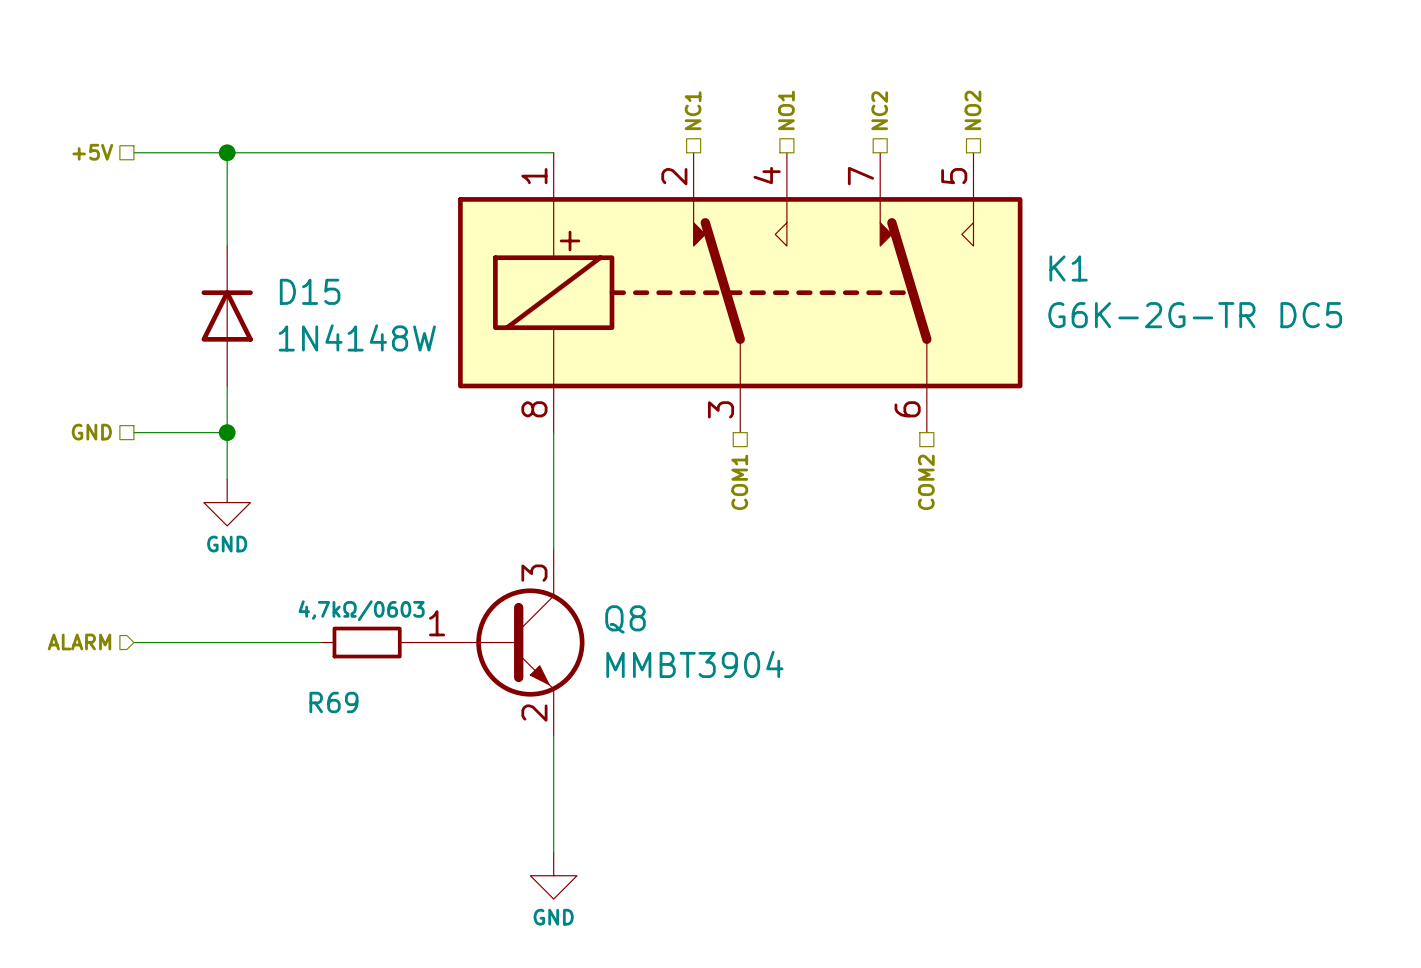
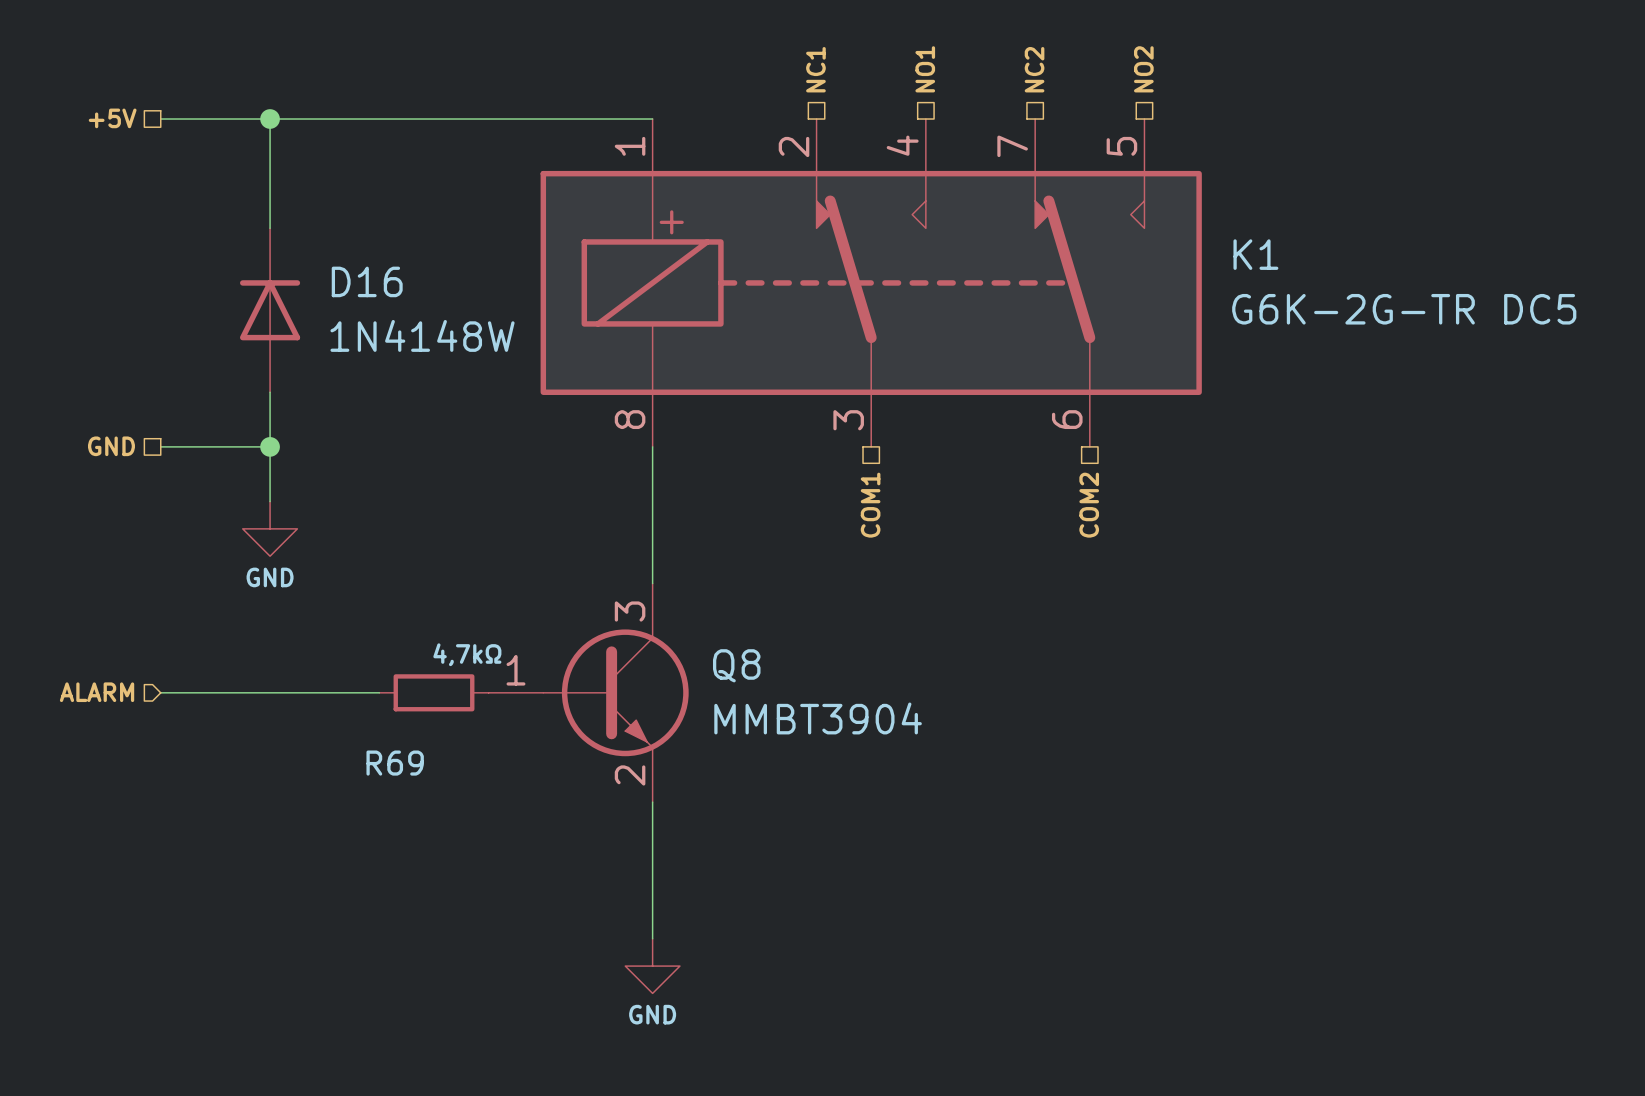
D15 name: D15 (310, 291) -> D16 (367, 281)
R69 value: 4,7kΩ/0603 (361, 610) -> 4,7kΩ (467, 654)

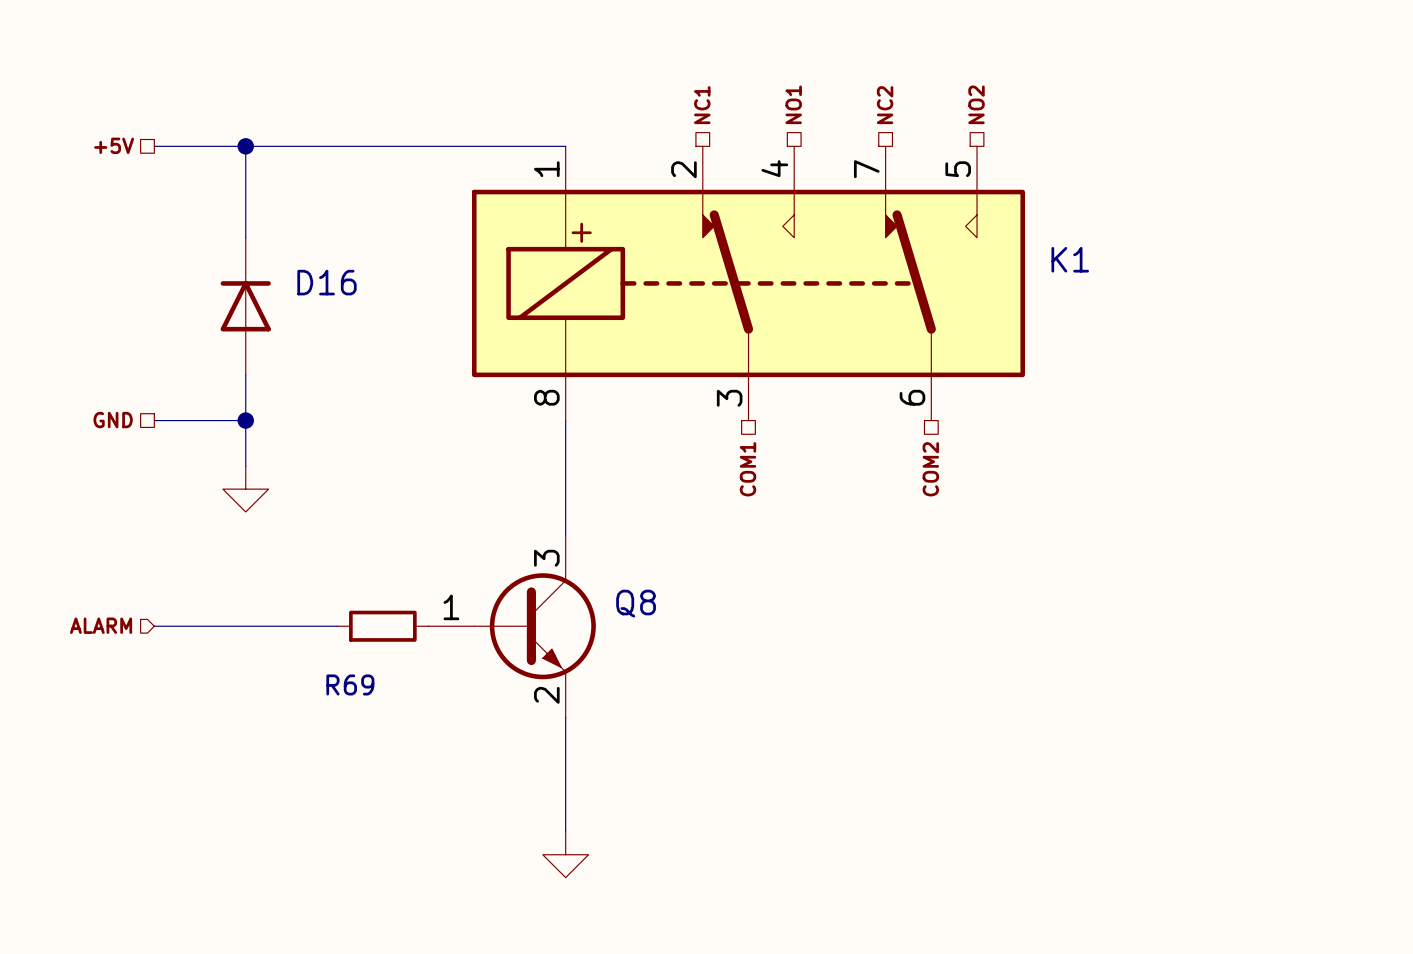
K1 value: G6K-2G-TR DC5 (1404, 309) -> none
D16 value: 1N4148W (422, 335) -> none
power symbol text: GND (270, 577) -> none
R69 value: 4,7kΩ (467, 654) -> none
Q8 value: MMBT3904 (818, 718) -> none
power symbol text: GND (652, 1014) -> none

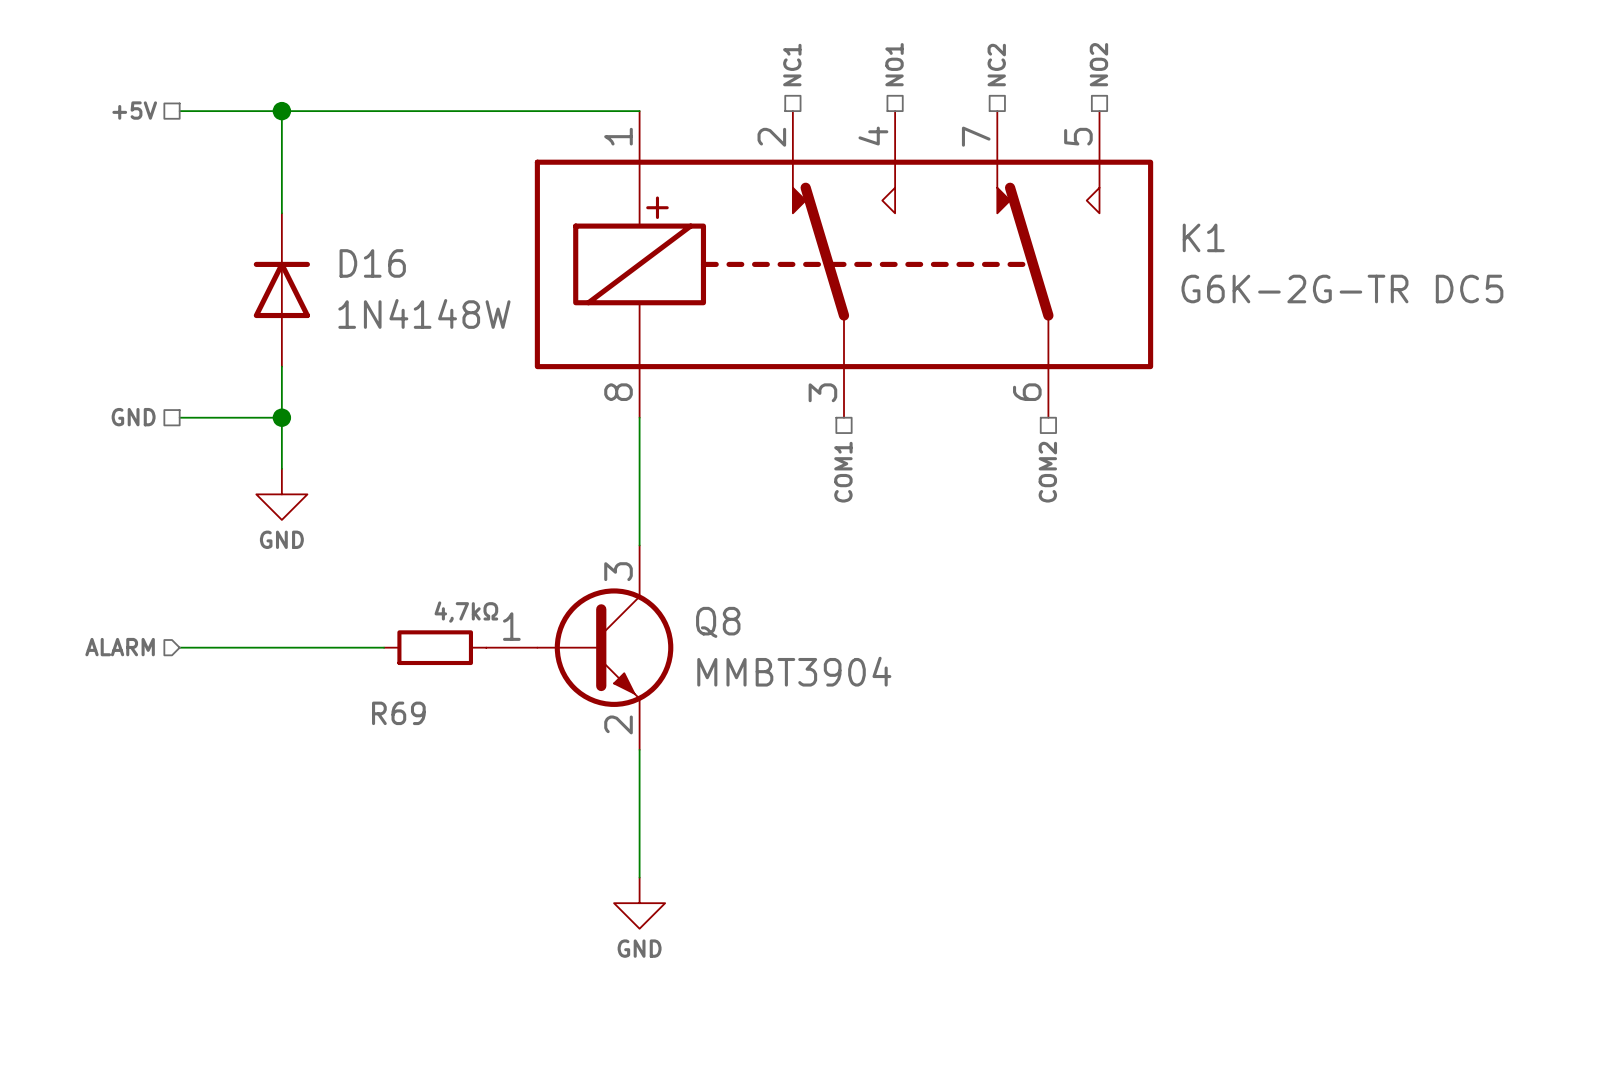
K1 value: none -> G6K-2G-TR DC5 (1342, 289)
D16 value: none -> 1N4148W (424, 313)
power symbol text: none -> GND (281, 539)
R69 value: none -> 4,7kΩ (466, 612)
Q8 value: none -> MMBT3904 (794, 671)
power symbol text: none -> GND (639, 948)

